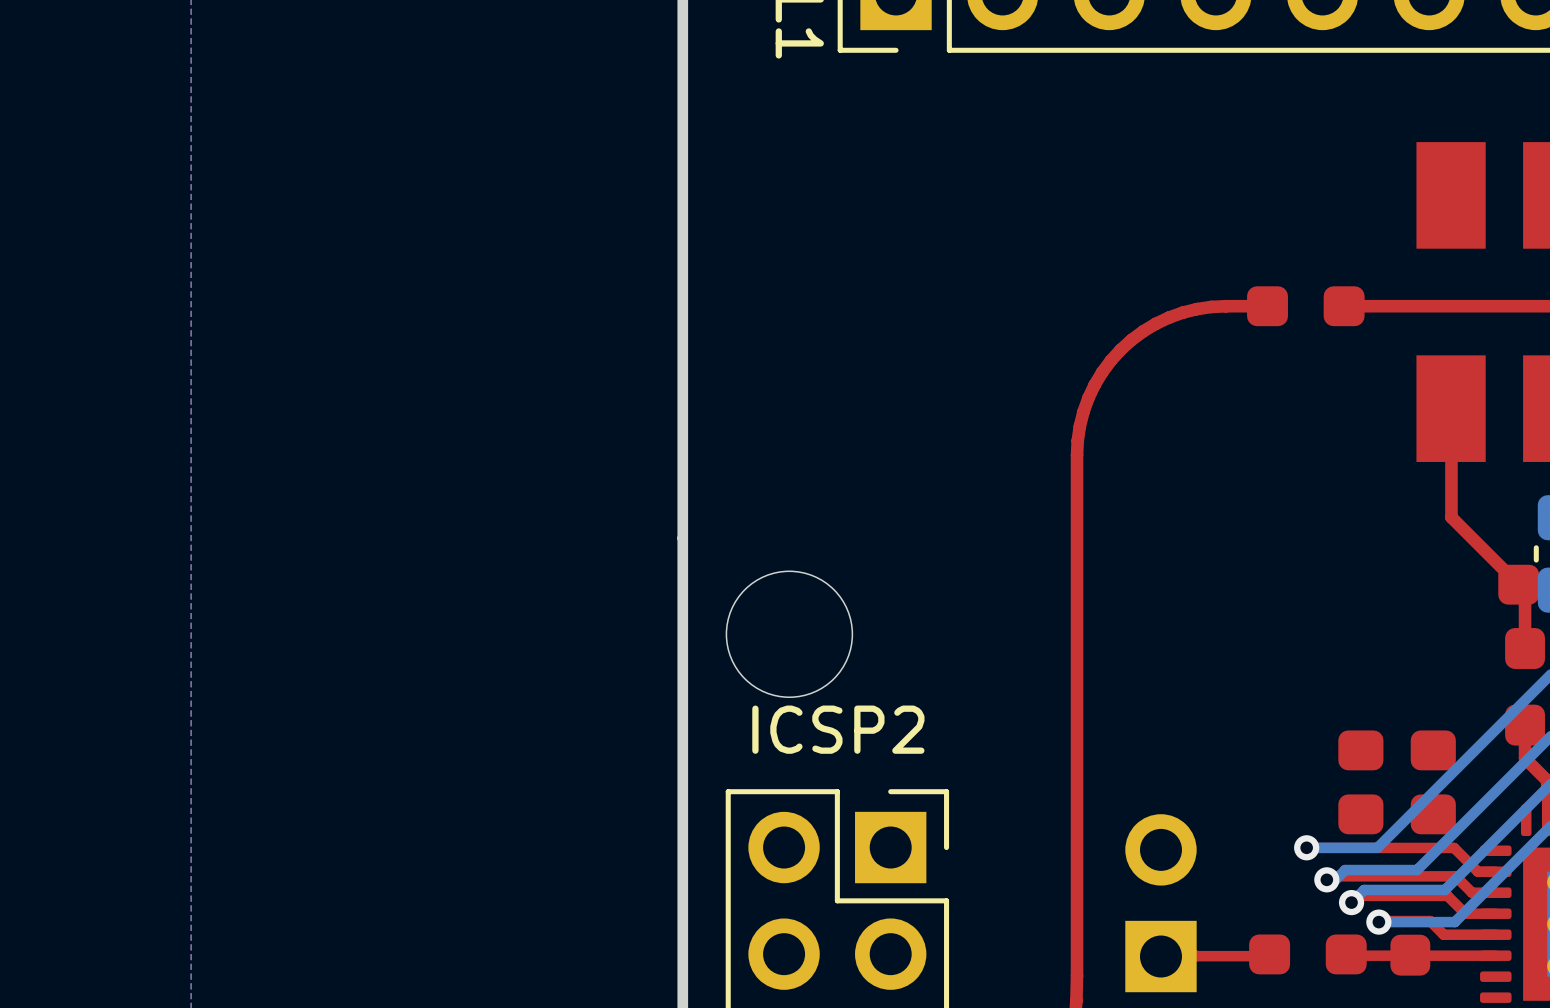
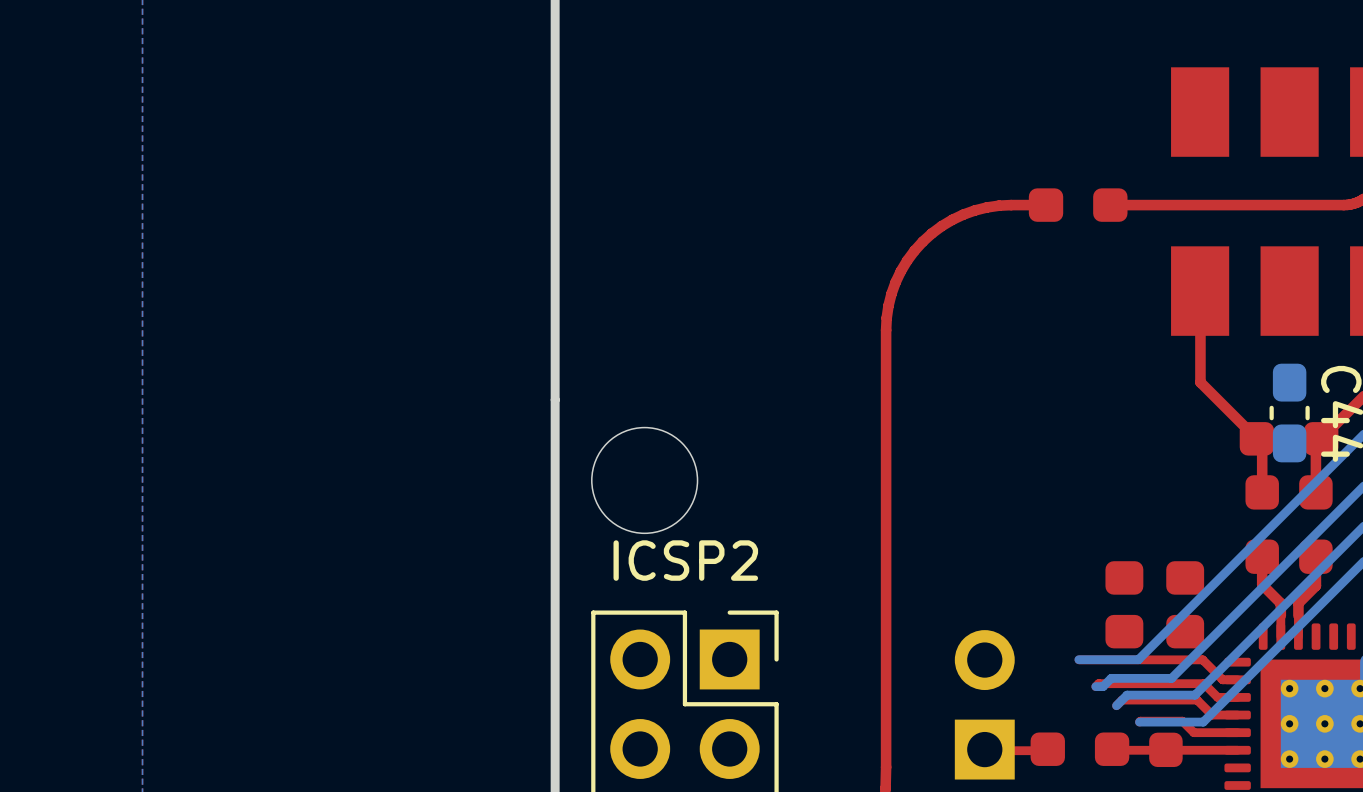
via: (1306, 847) -> none
via: (1326, 879) -> none
via: (1351, 902) -> none
part position: (1160, 903) -> (984, 704)
via: (1378, 922) -> none

